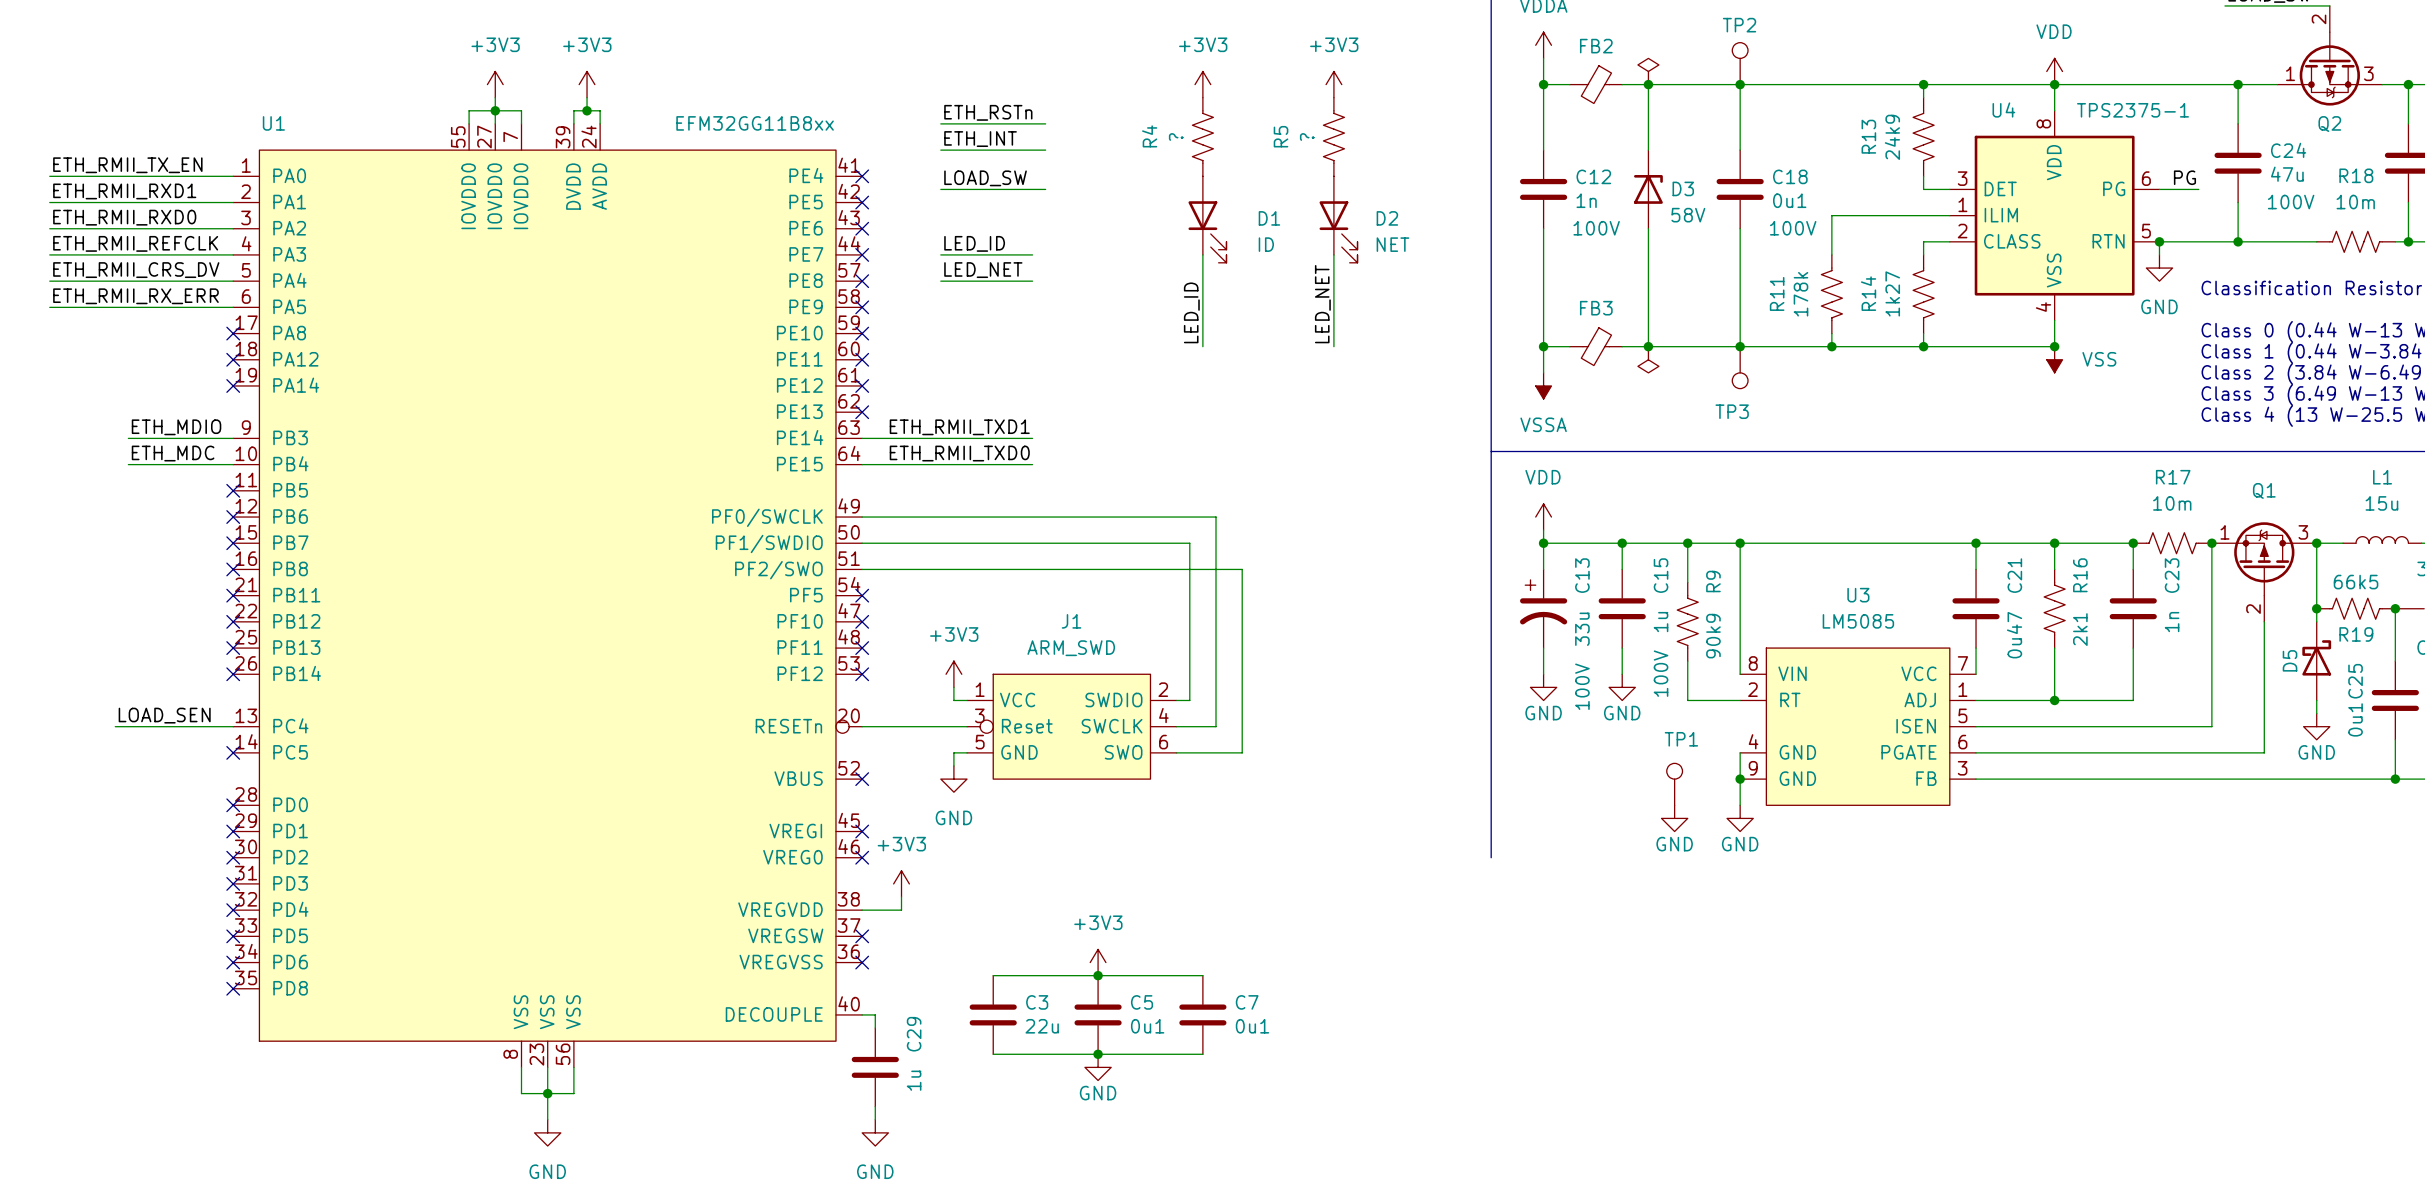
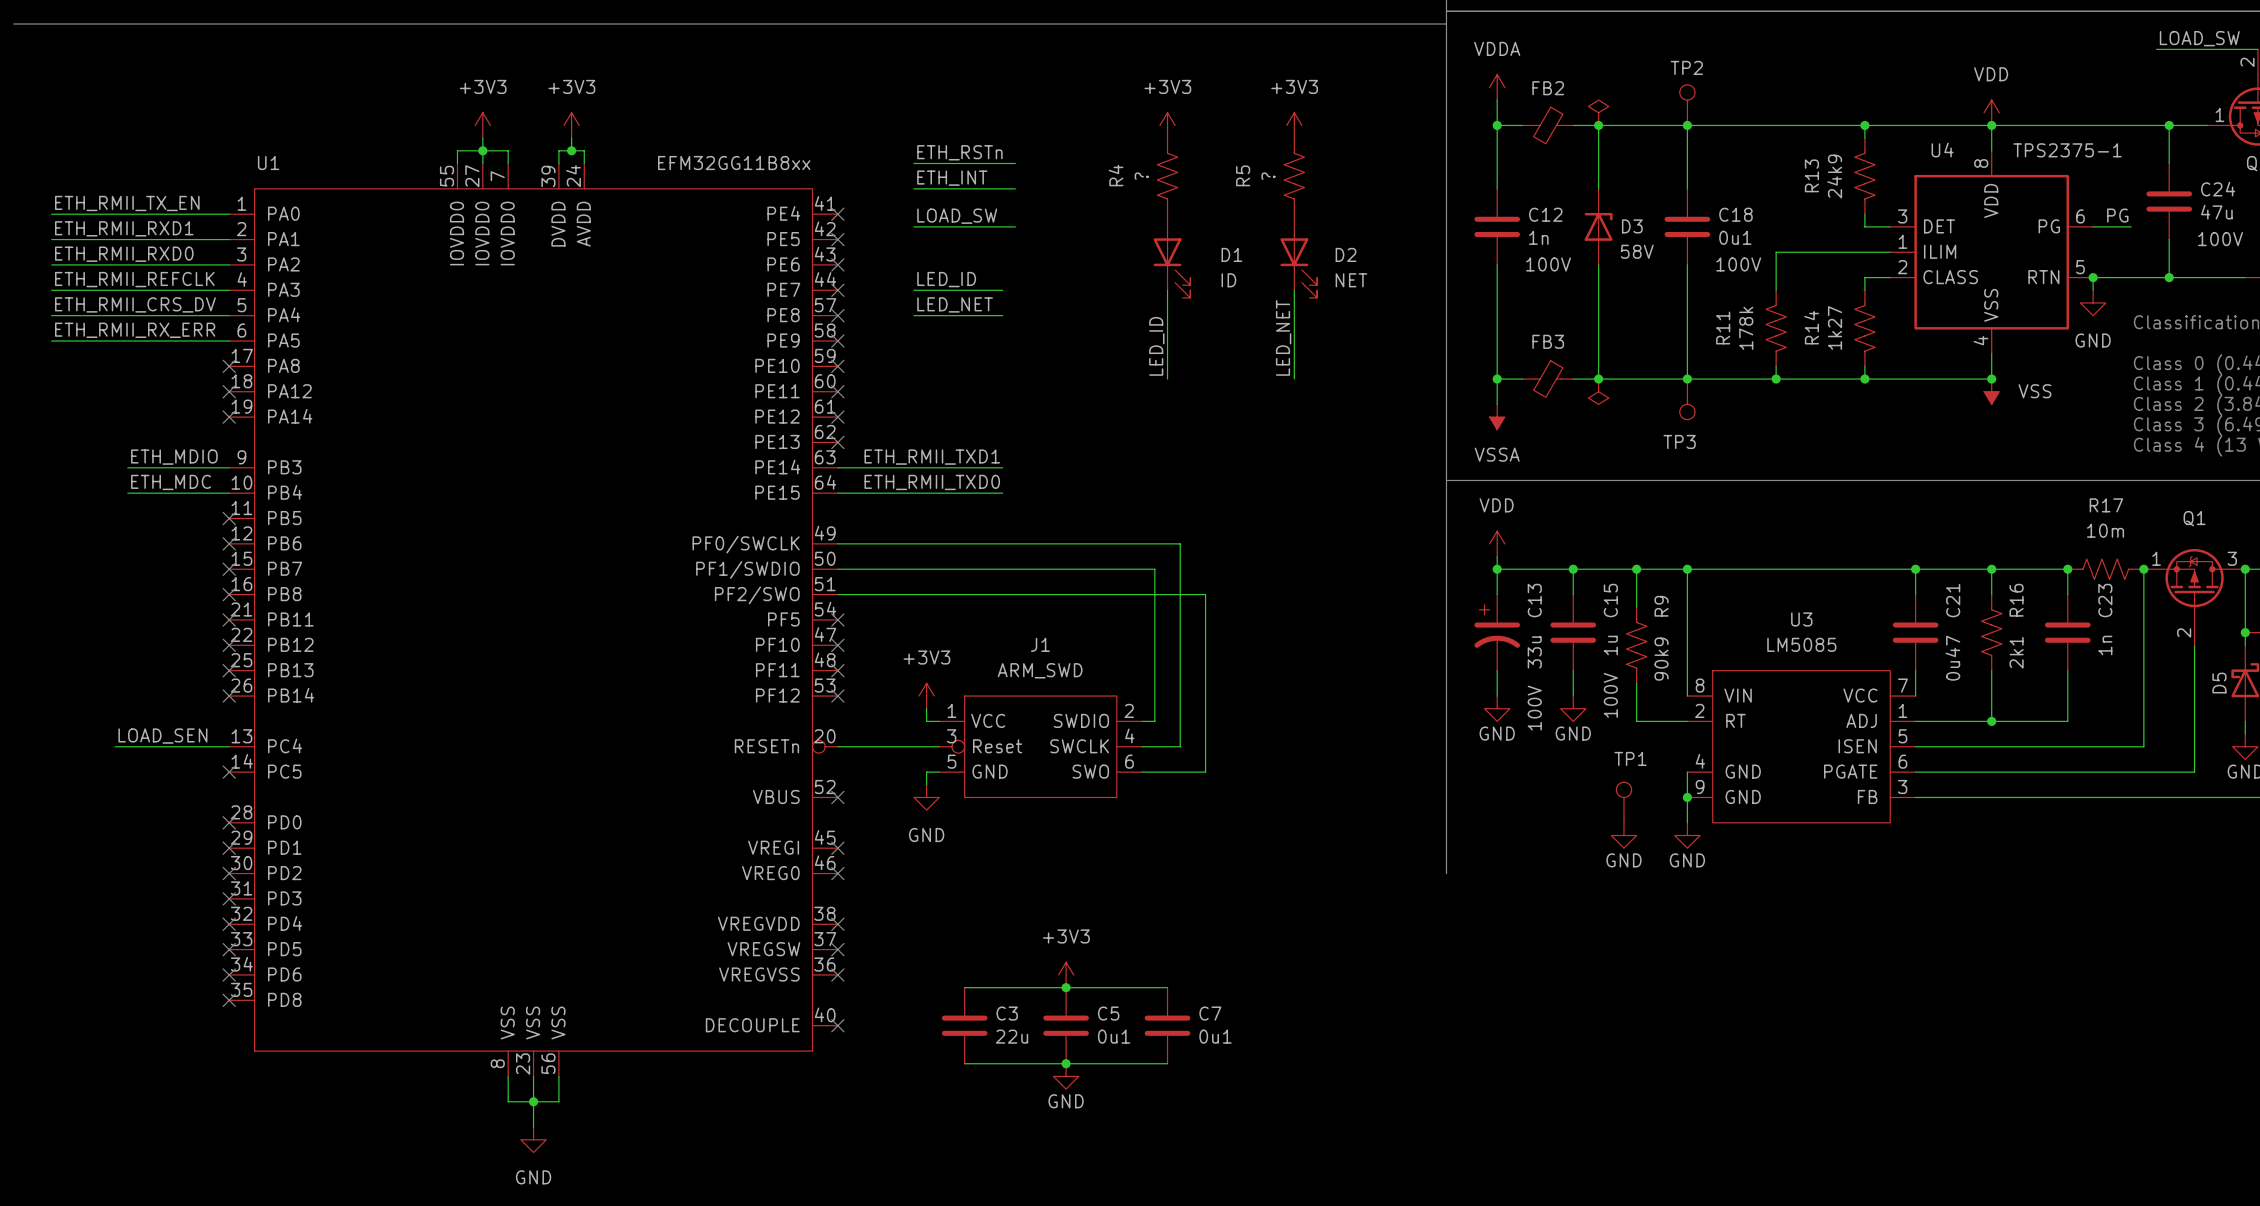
power symbol: +3V3 (901, 883) -> none
wire: (901, 897) (901, 910) (862, 910) -> none
no-connect mark: none -> (837, 924)
wire: (862, 1014) (875, 1014) (875, 1028) -> none
no-connect mark: none -> (837, 1025)
C29: 1u (875, 1067) -> none
wire: (875, 1106) (875, 1119) -> none
power symbol: GND (875, 1132) -> none

